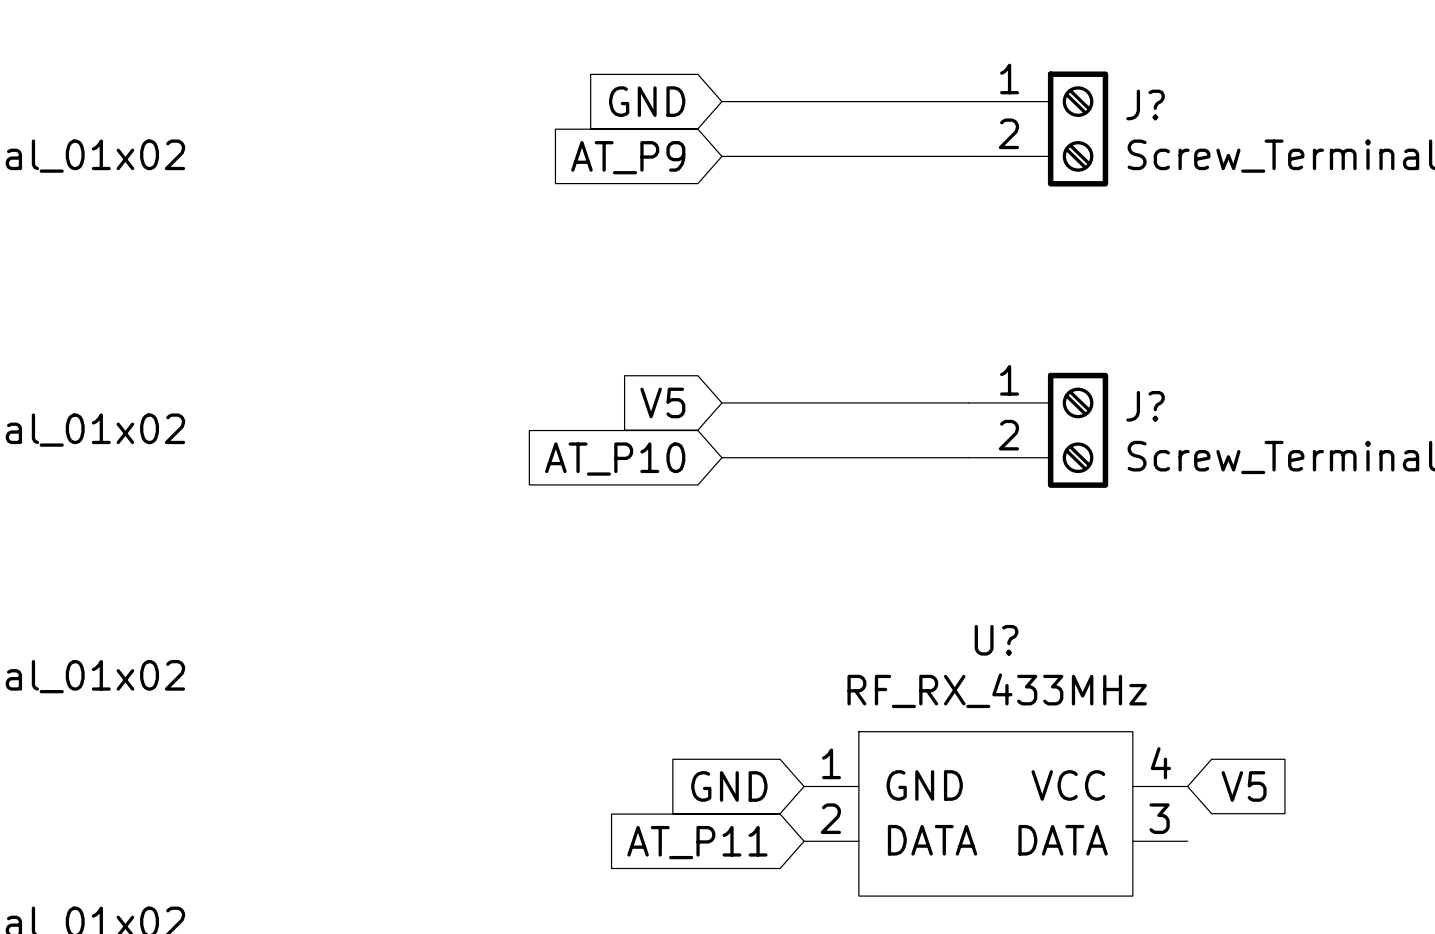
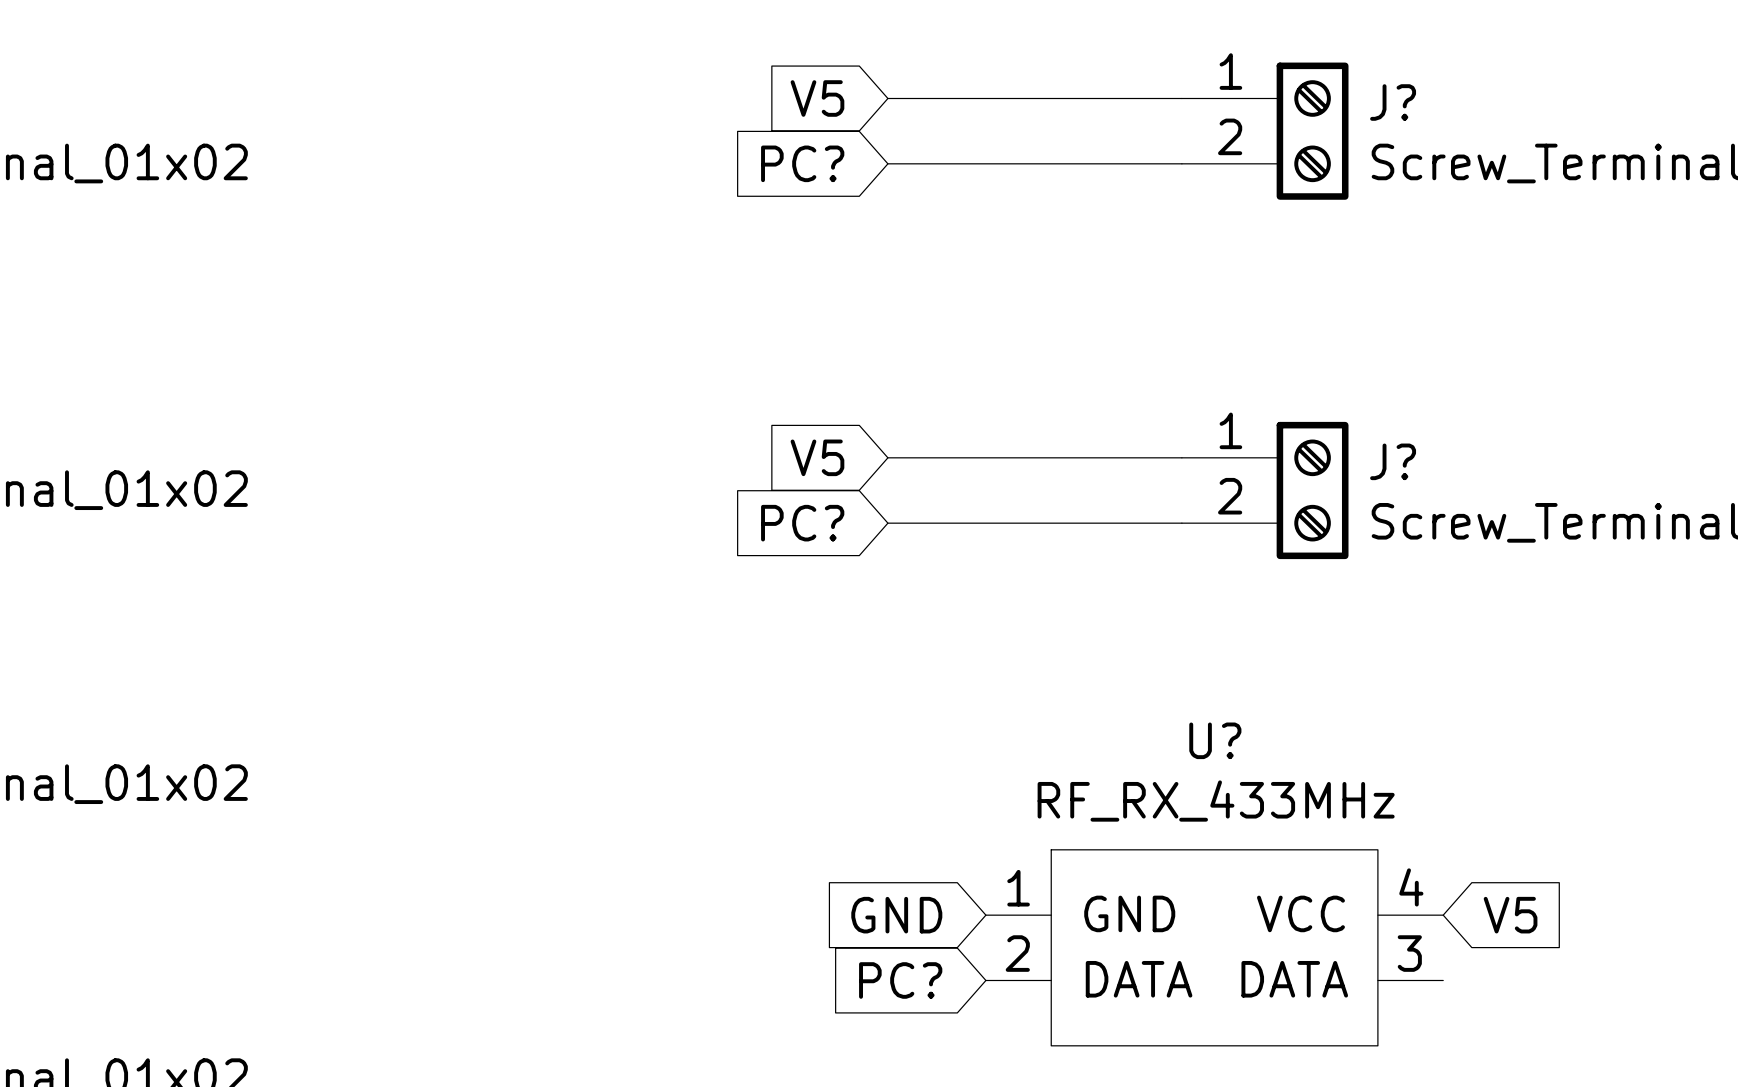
global label: GND (647, 101) -> V5 (817, 98)
global label: AT_P9 (628, 157) -> PC? (802, 163)
global label: AT_P10 (615, 459) -> PC? (802, 523)
global label: AT_P11 (697, 842) -> PC? (900, 980)

